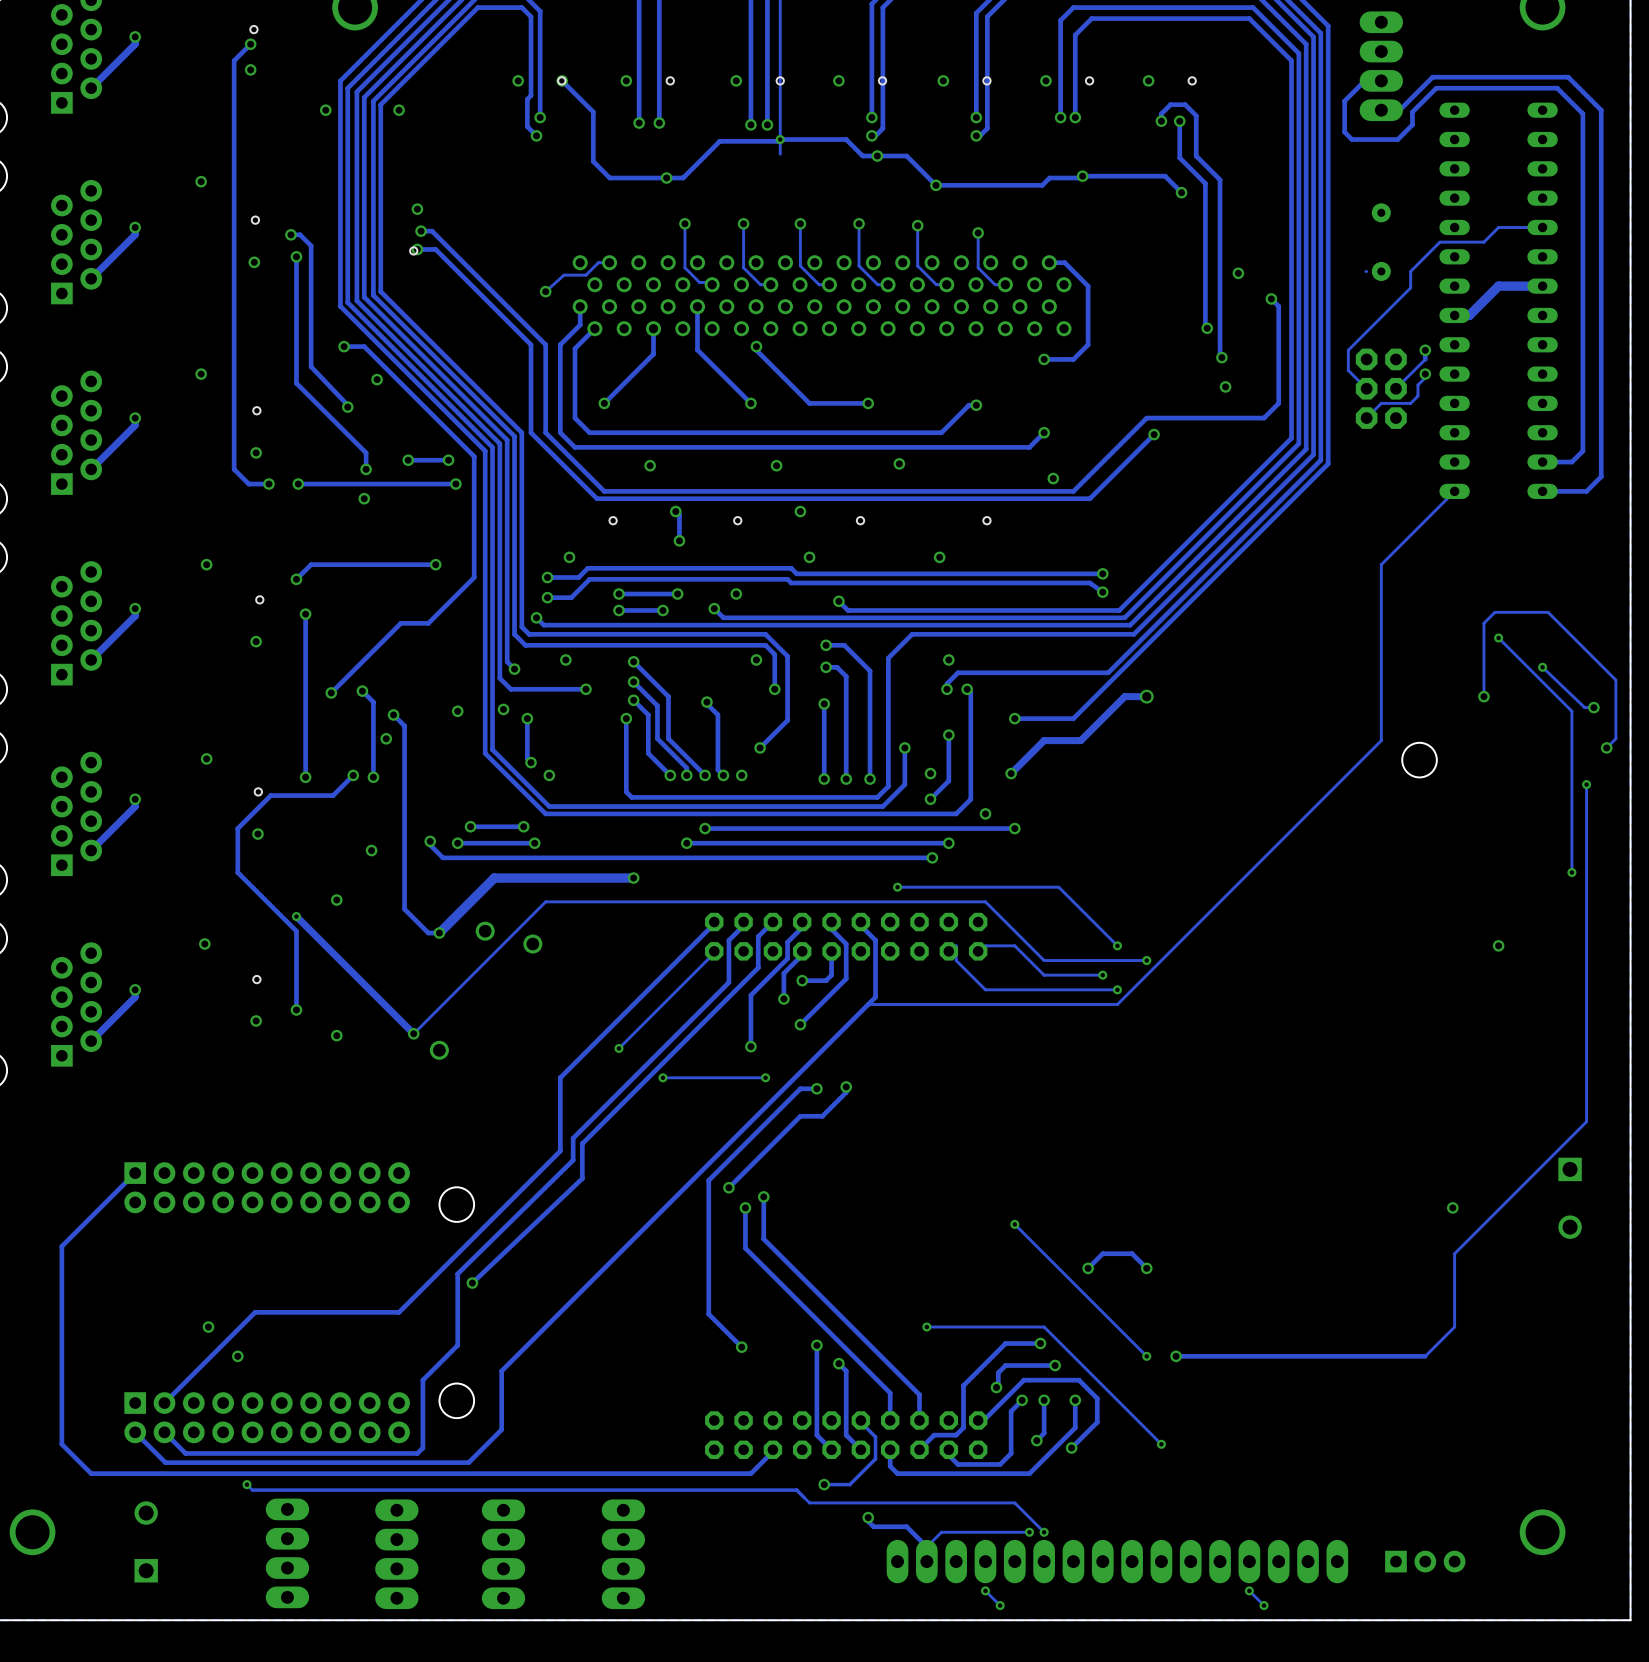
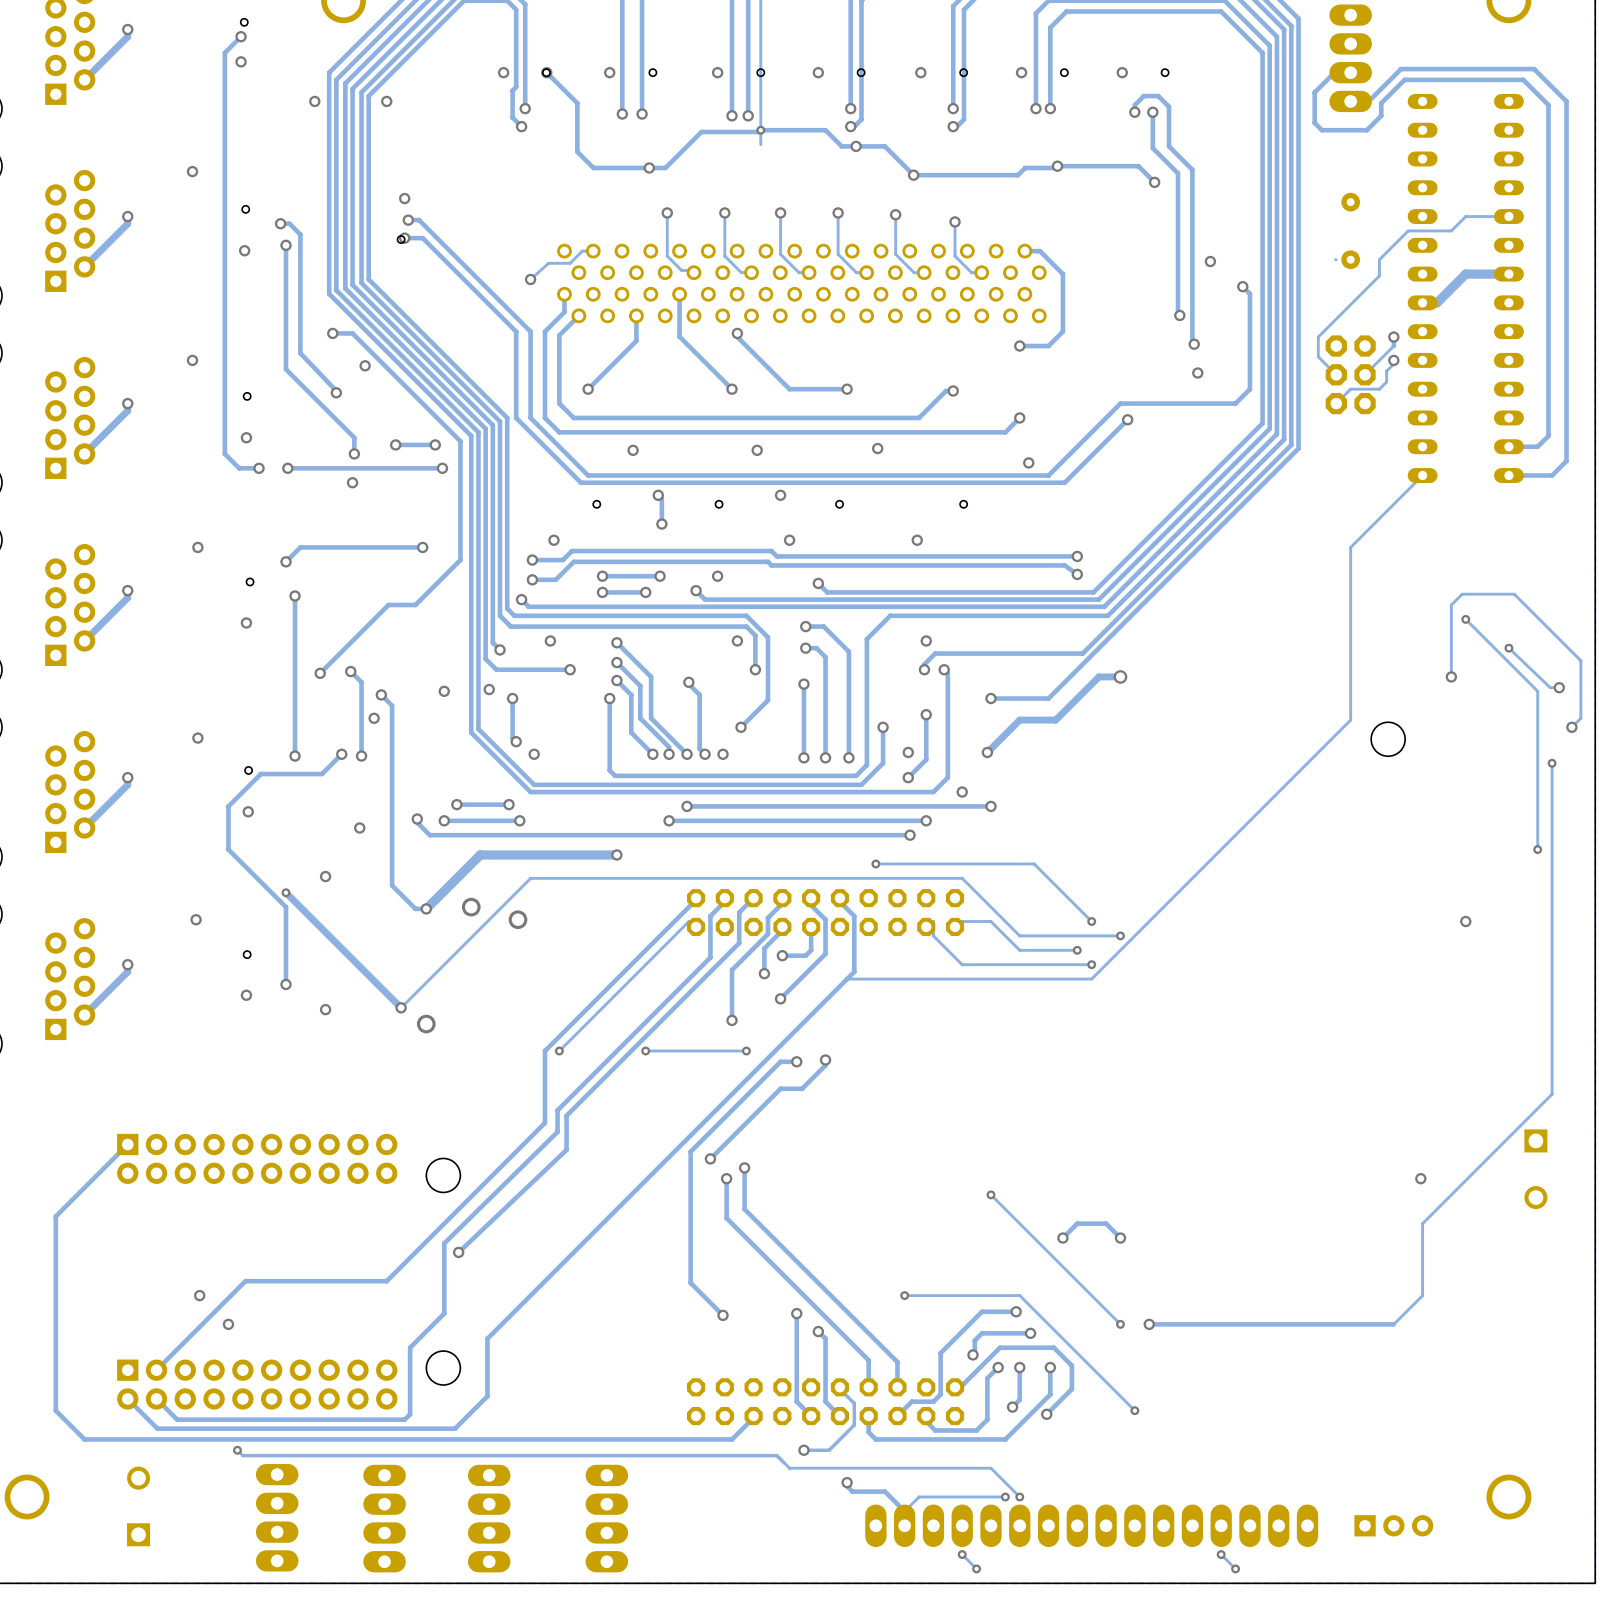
track: (714, 951) (618, 1048) -> (696, 926) (688, 921) (559, 1051)
via position: (618, 1048) -> (559, 1051)

